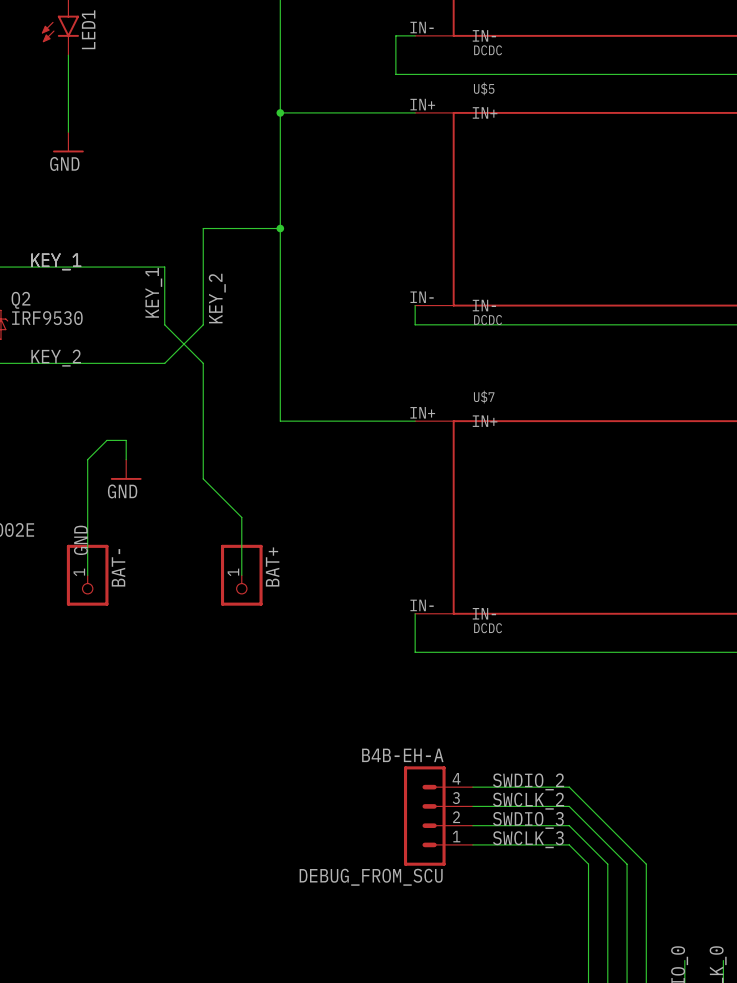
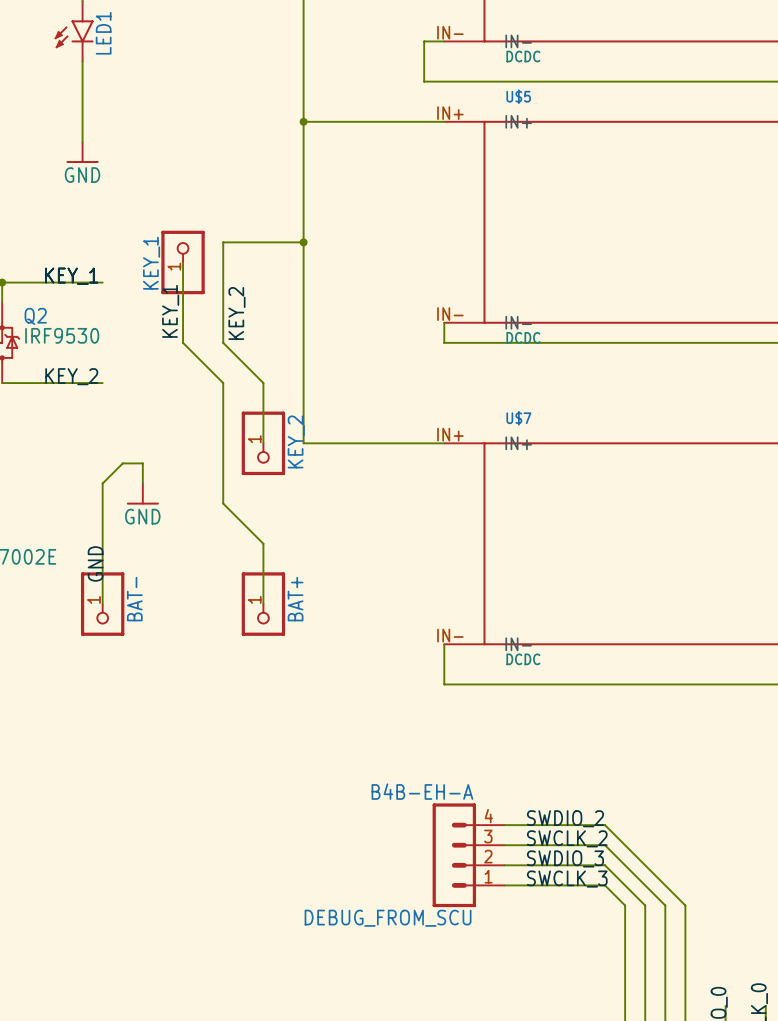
KEY_1: none -> (183, 262)
wire: (87, 267) (164, 267) -> (183, 262) (183, 282)
wire: (203, 324) (164, 363) (87, 363) -> (223, 342) (263, 383) (263, 443)
KEY_2: none -> (263, 443)

